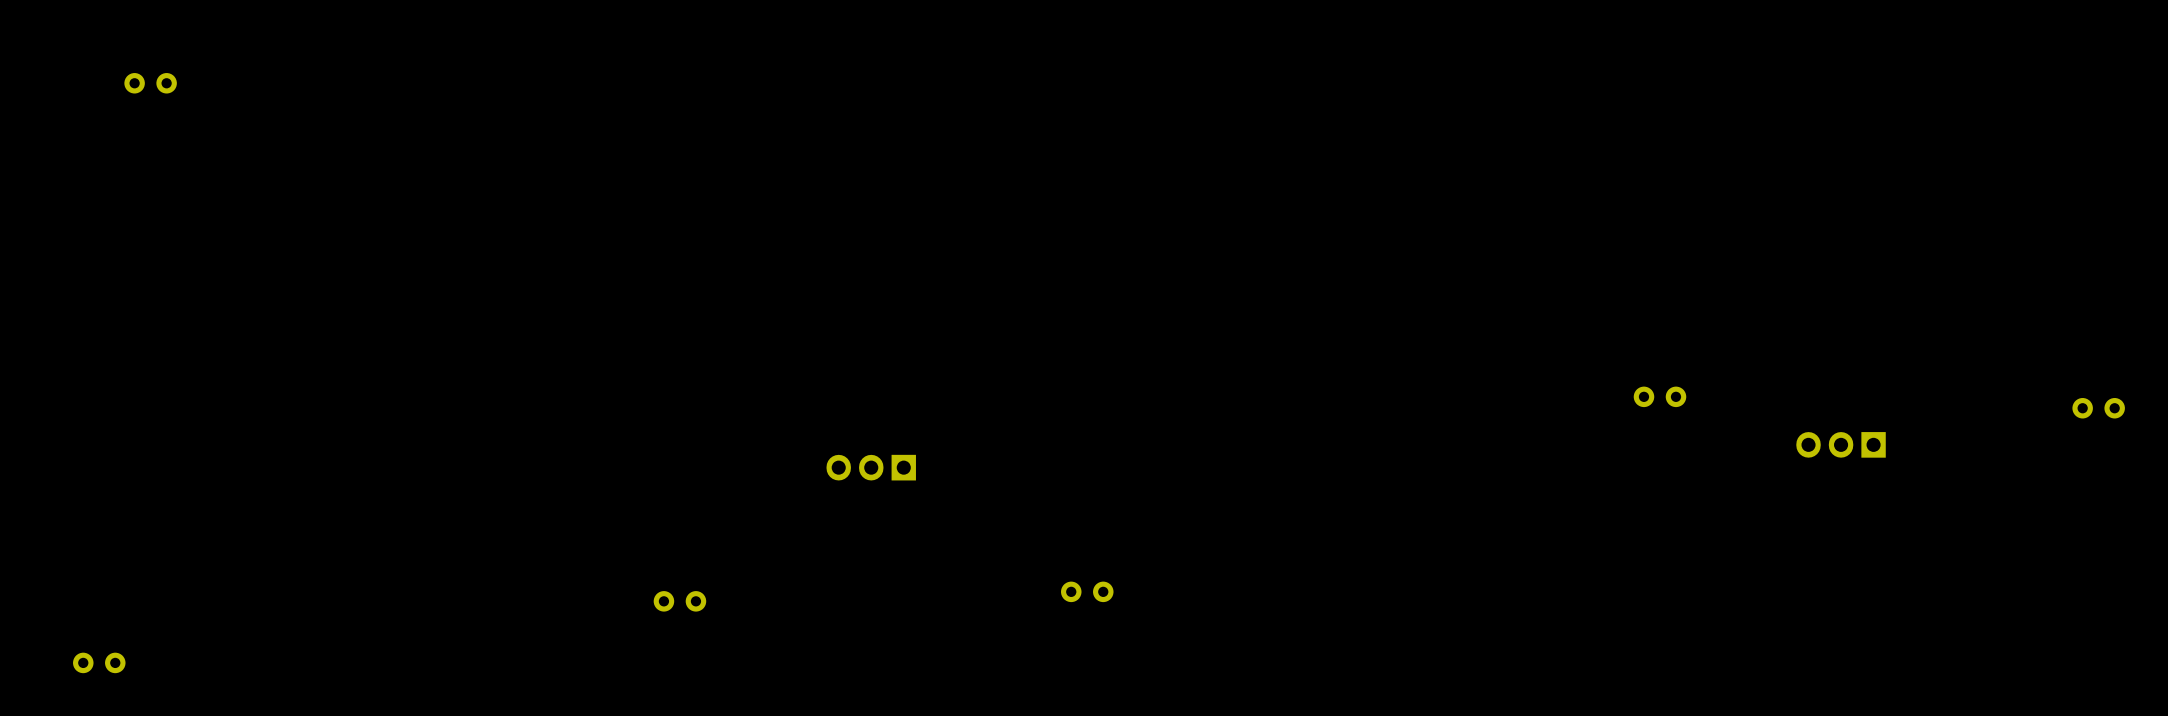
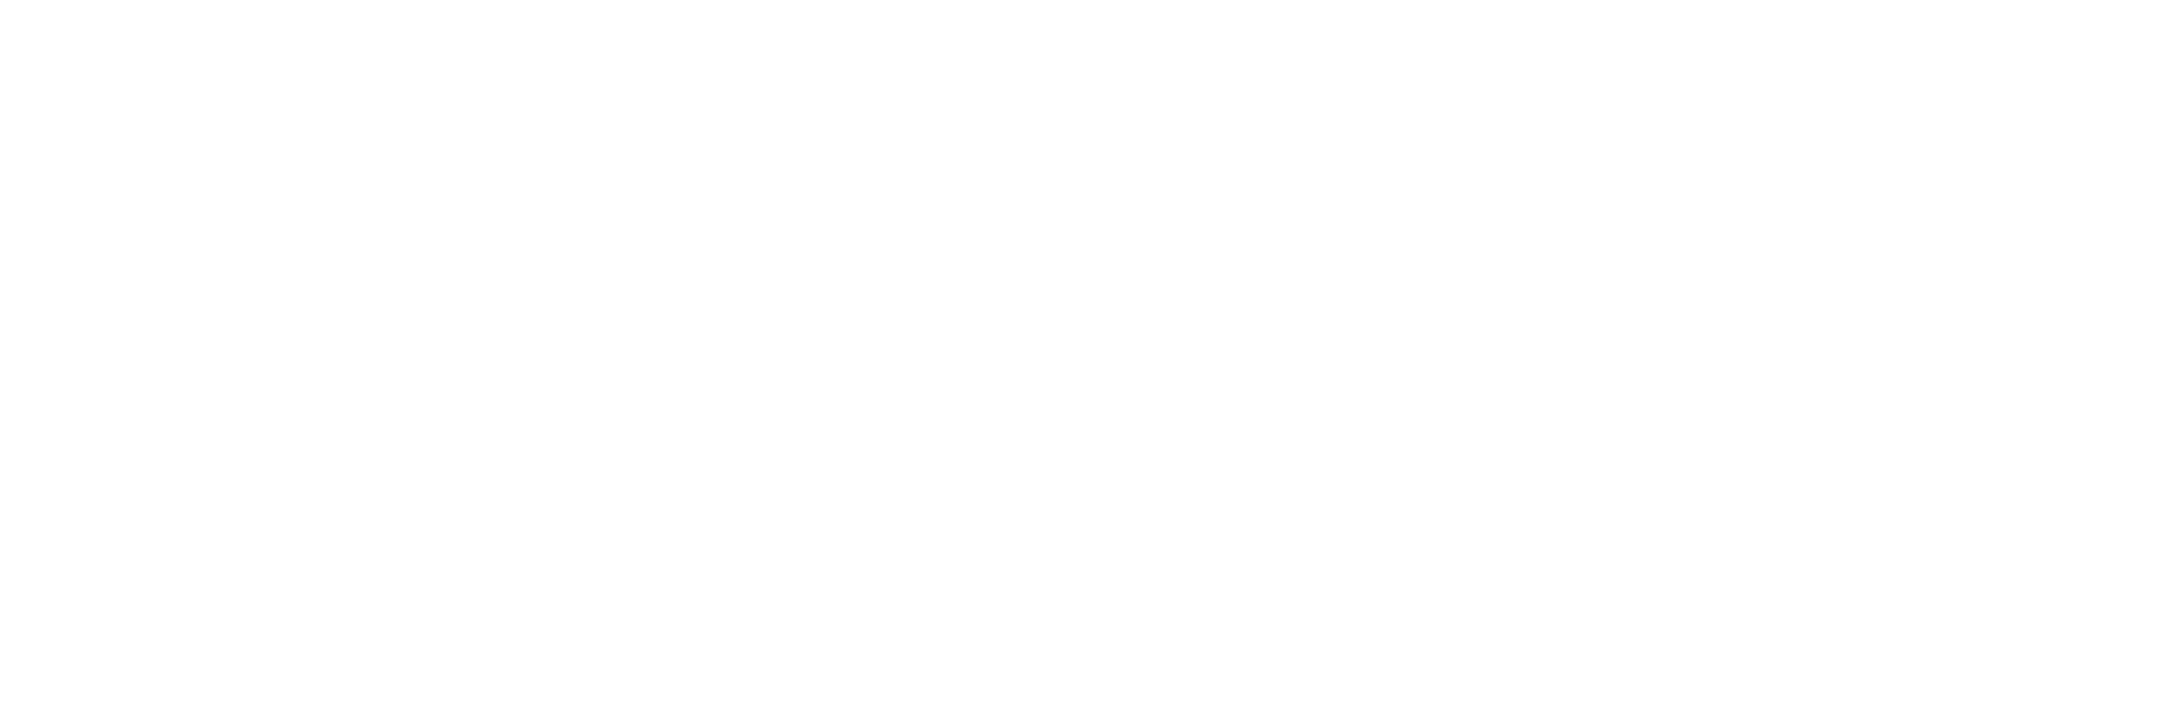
part: (150, 83) -> none
part: (1659, 396) -> none
part: (2098, 408) -> none
part: (1841, 444) -> none
part: (871, 467) -> none
part: (1087, 591) -> none
part: (679, 601) -> none
part: (99, 662) -> none

